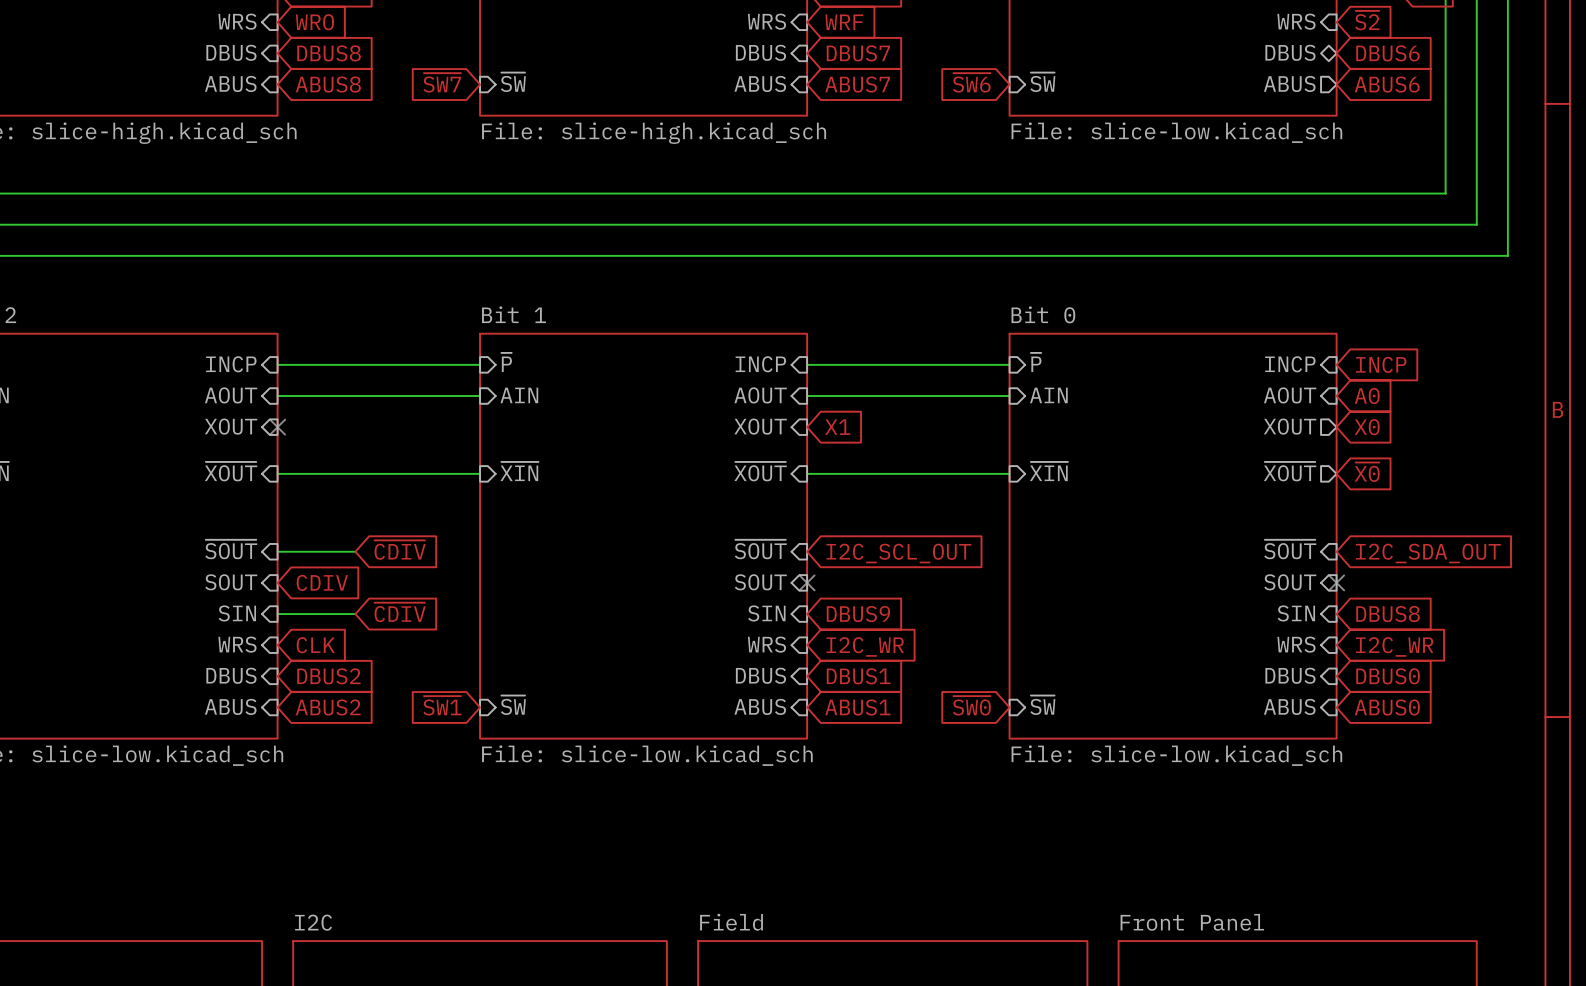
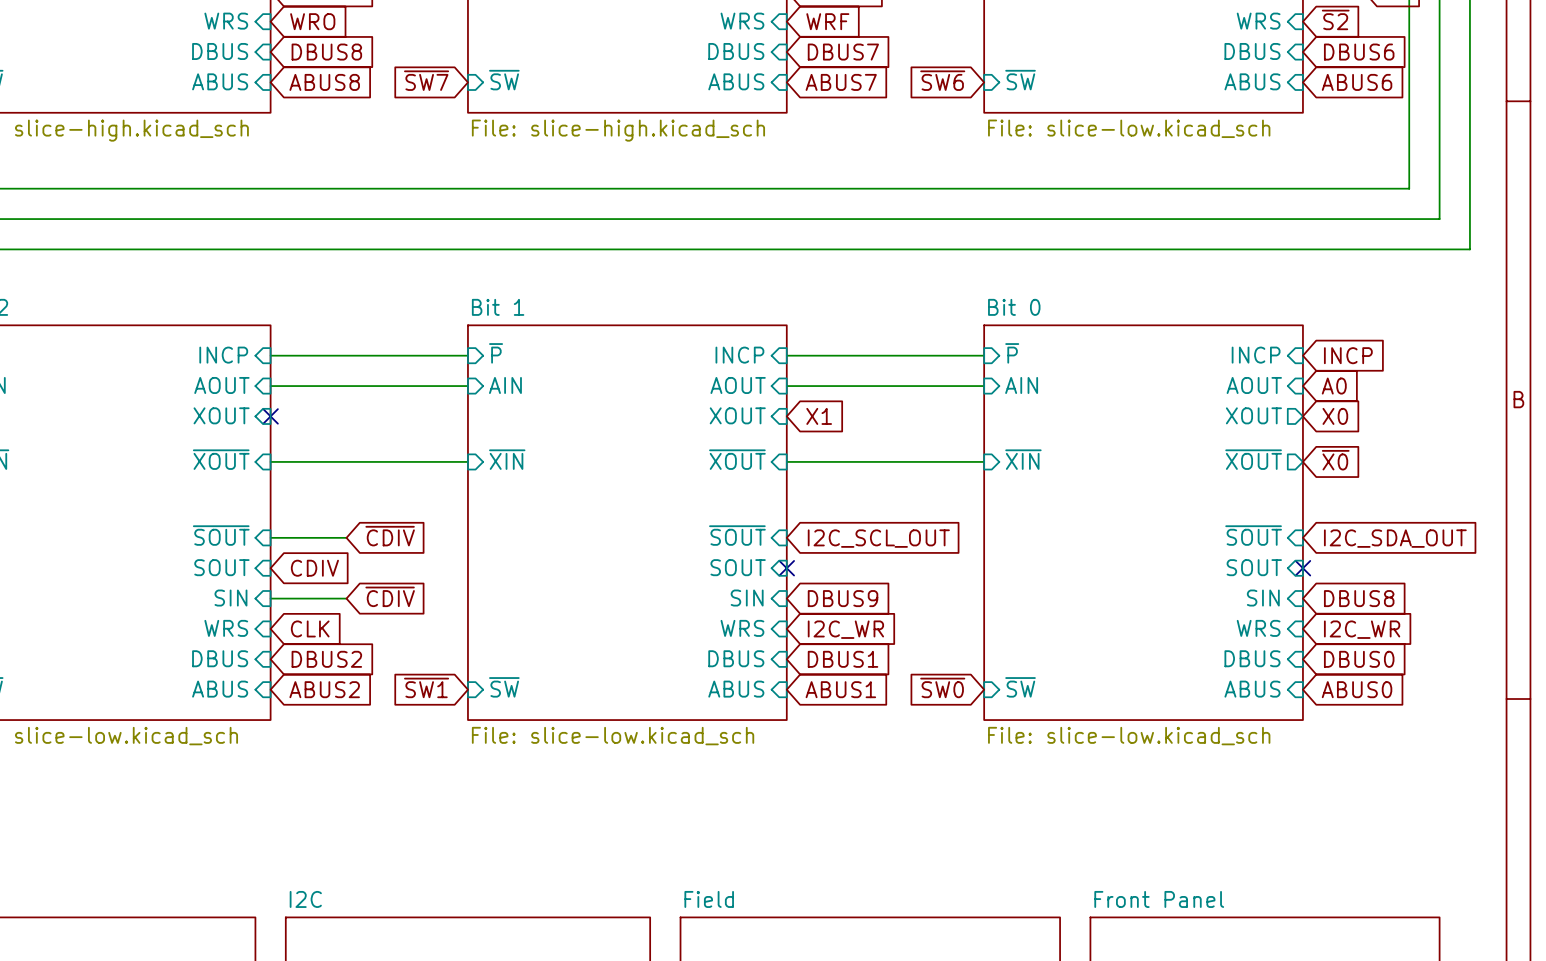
sheet pin shape: bidirectional (1290, 52) -> input (1252, 51)
sheet pin shape: output (1289, 83) -> input (1252, 81)

